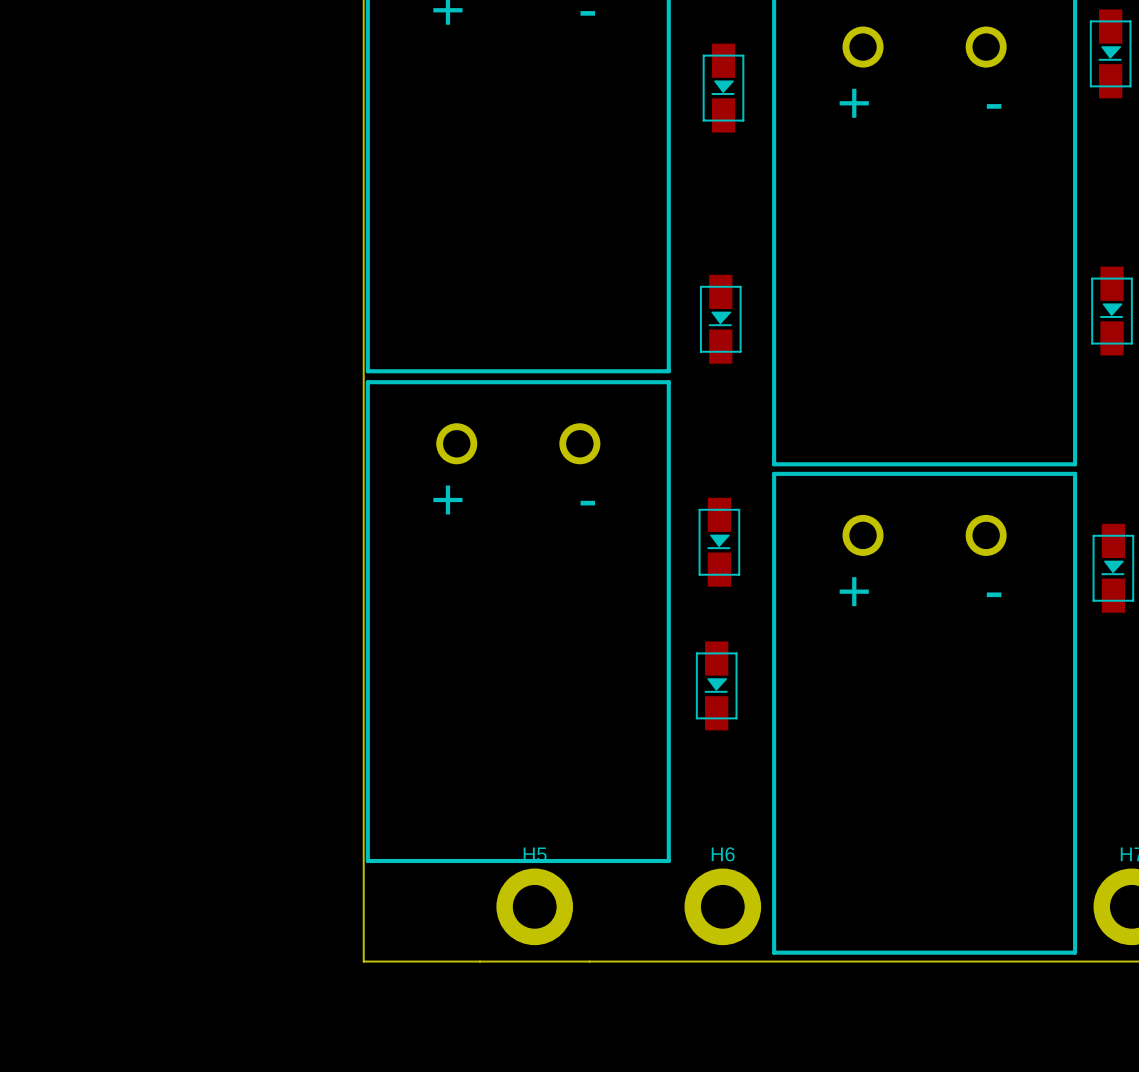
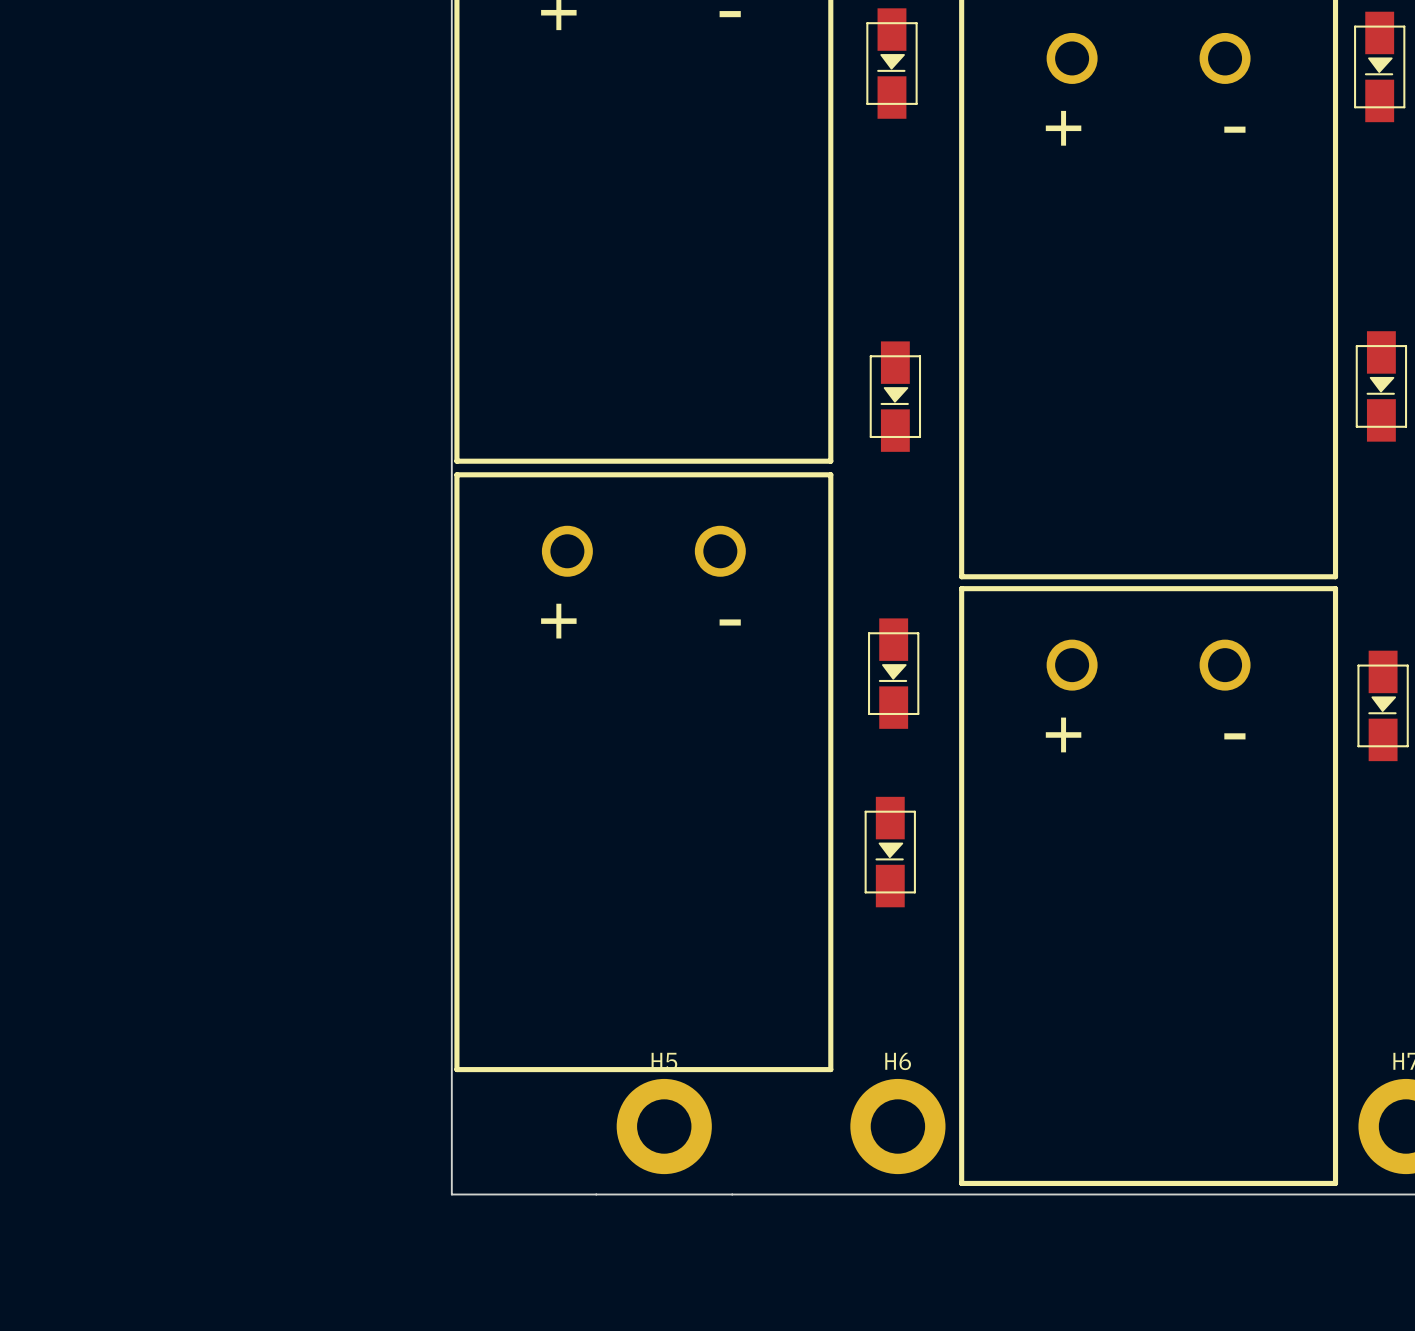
part position: (723, 88) -> (891, 63)

